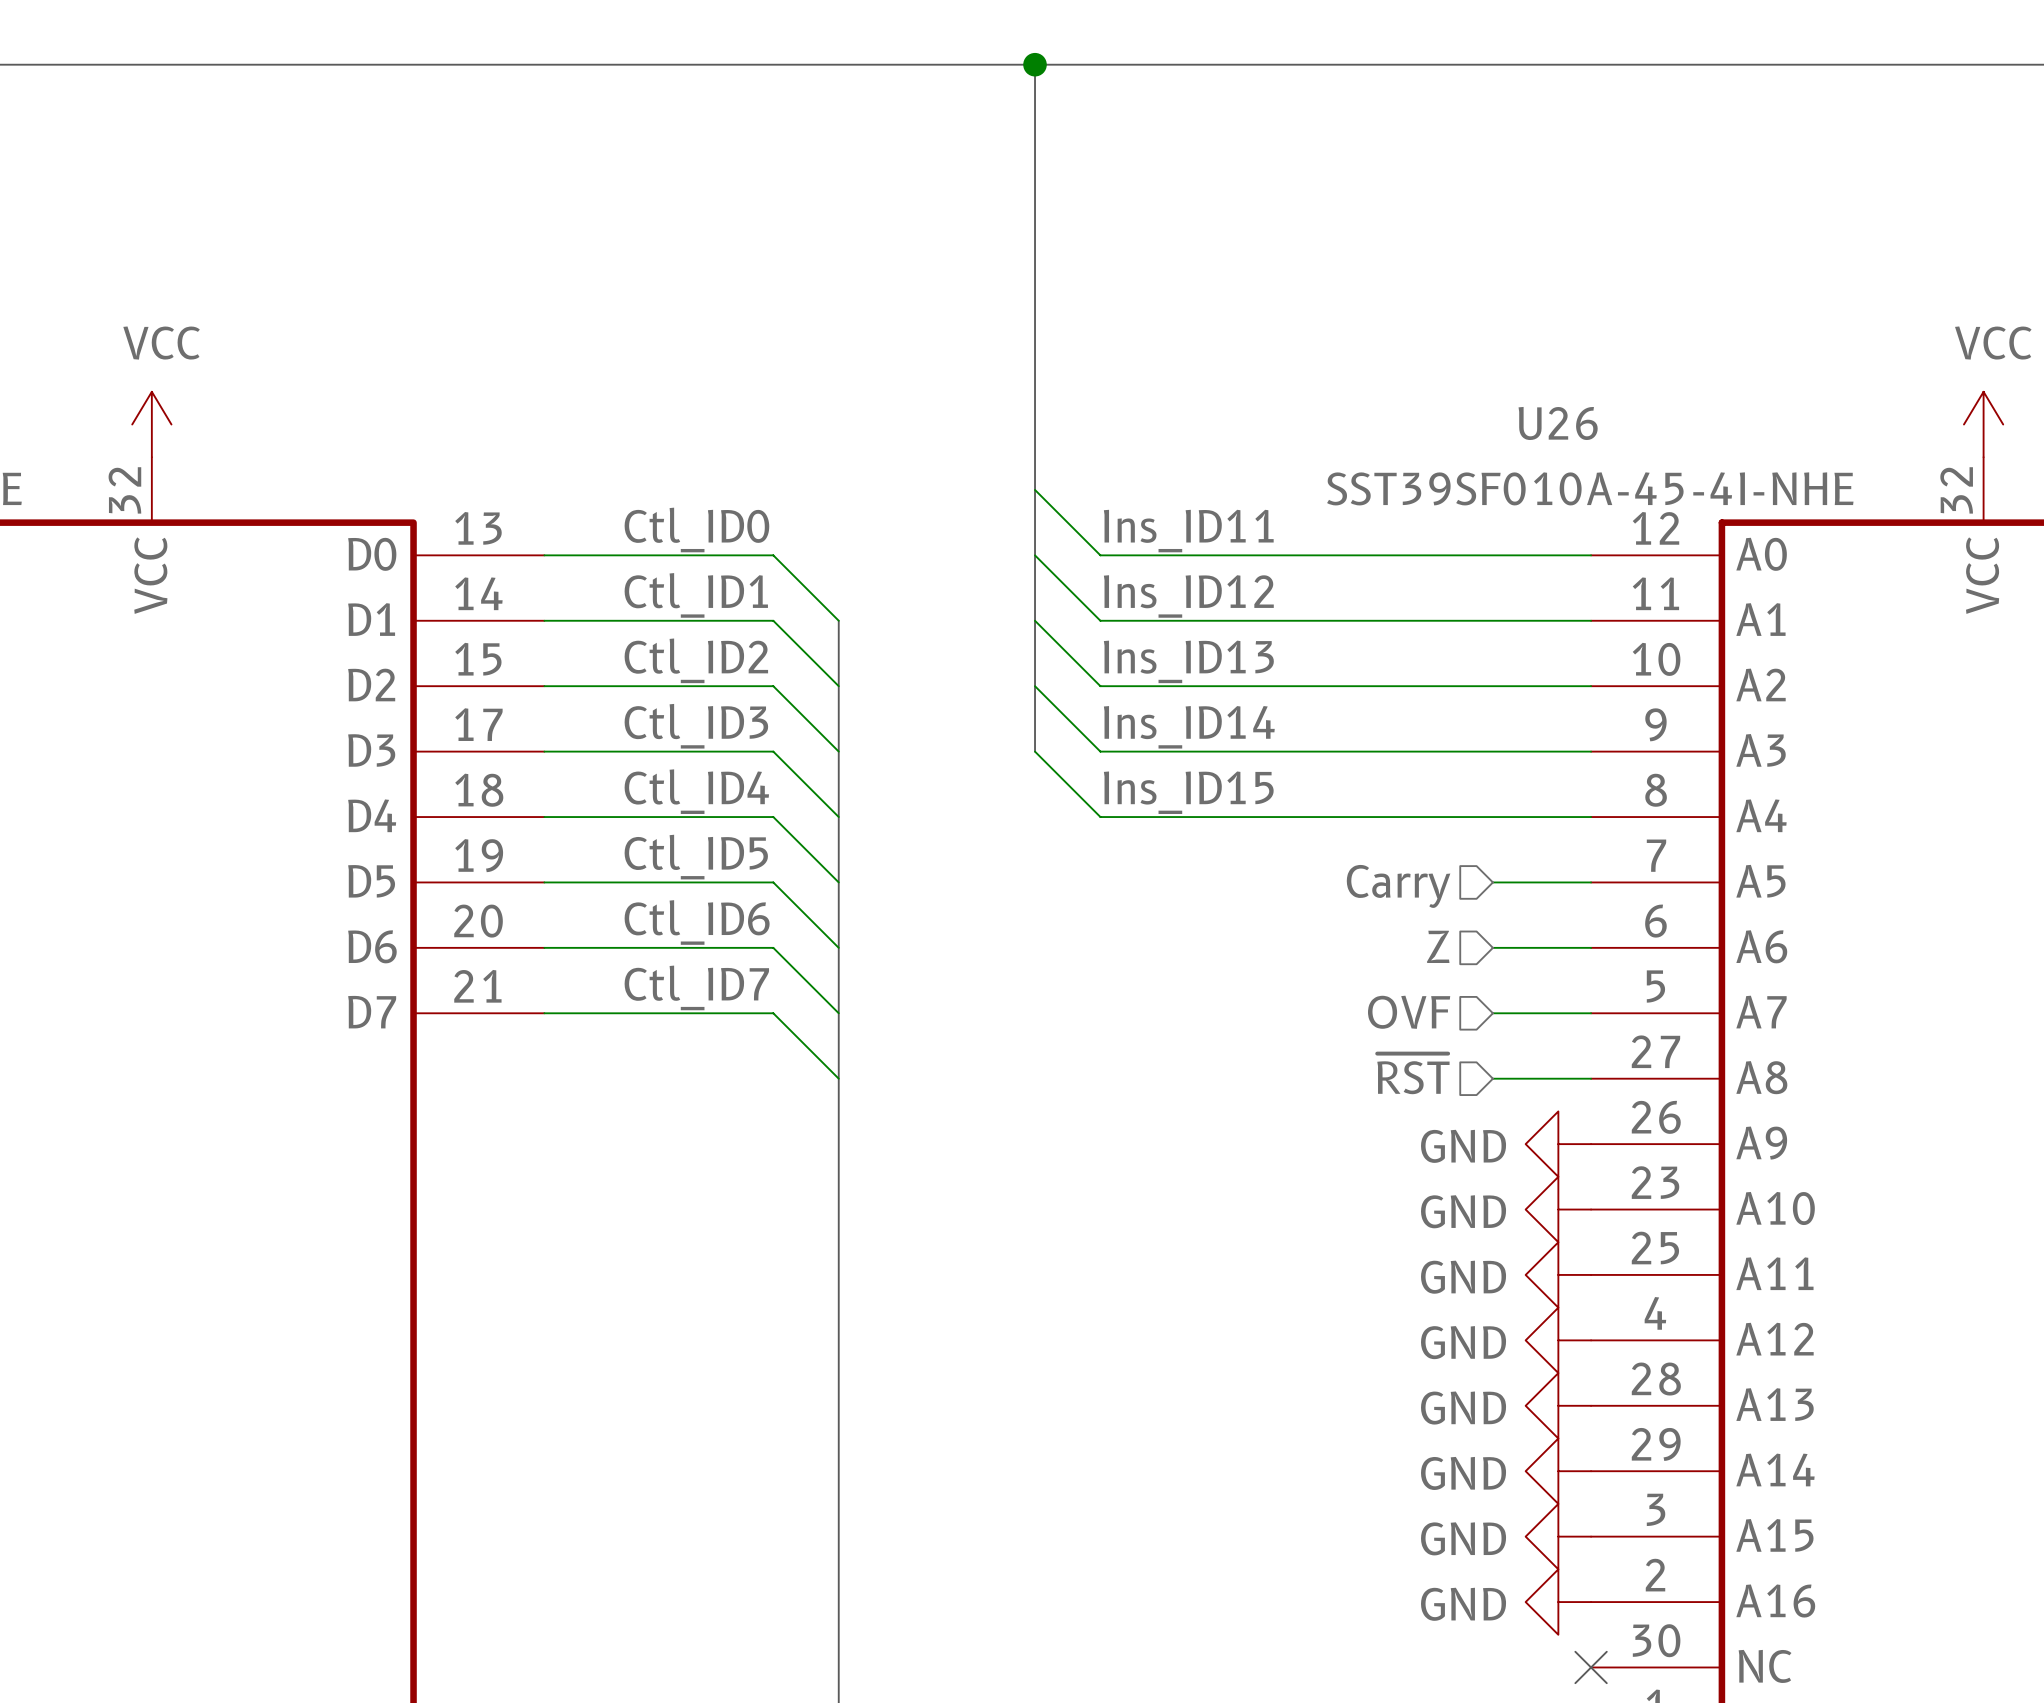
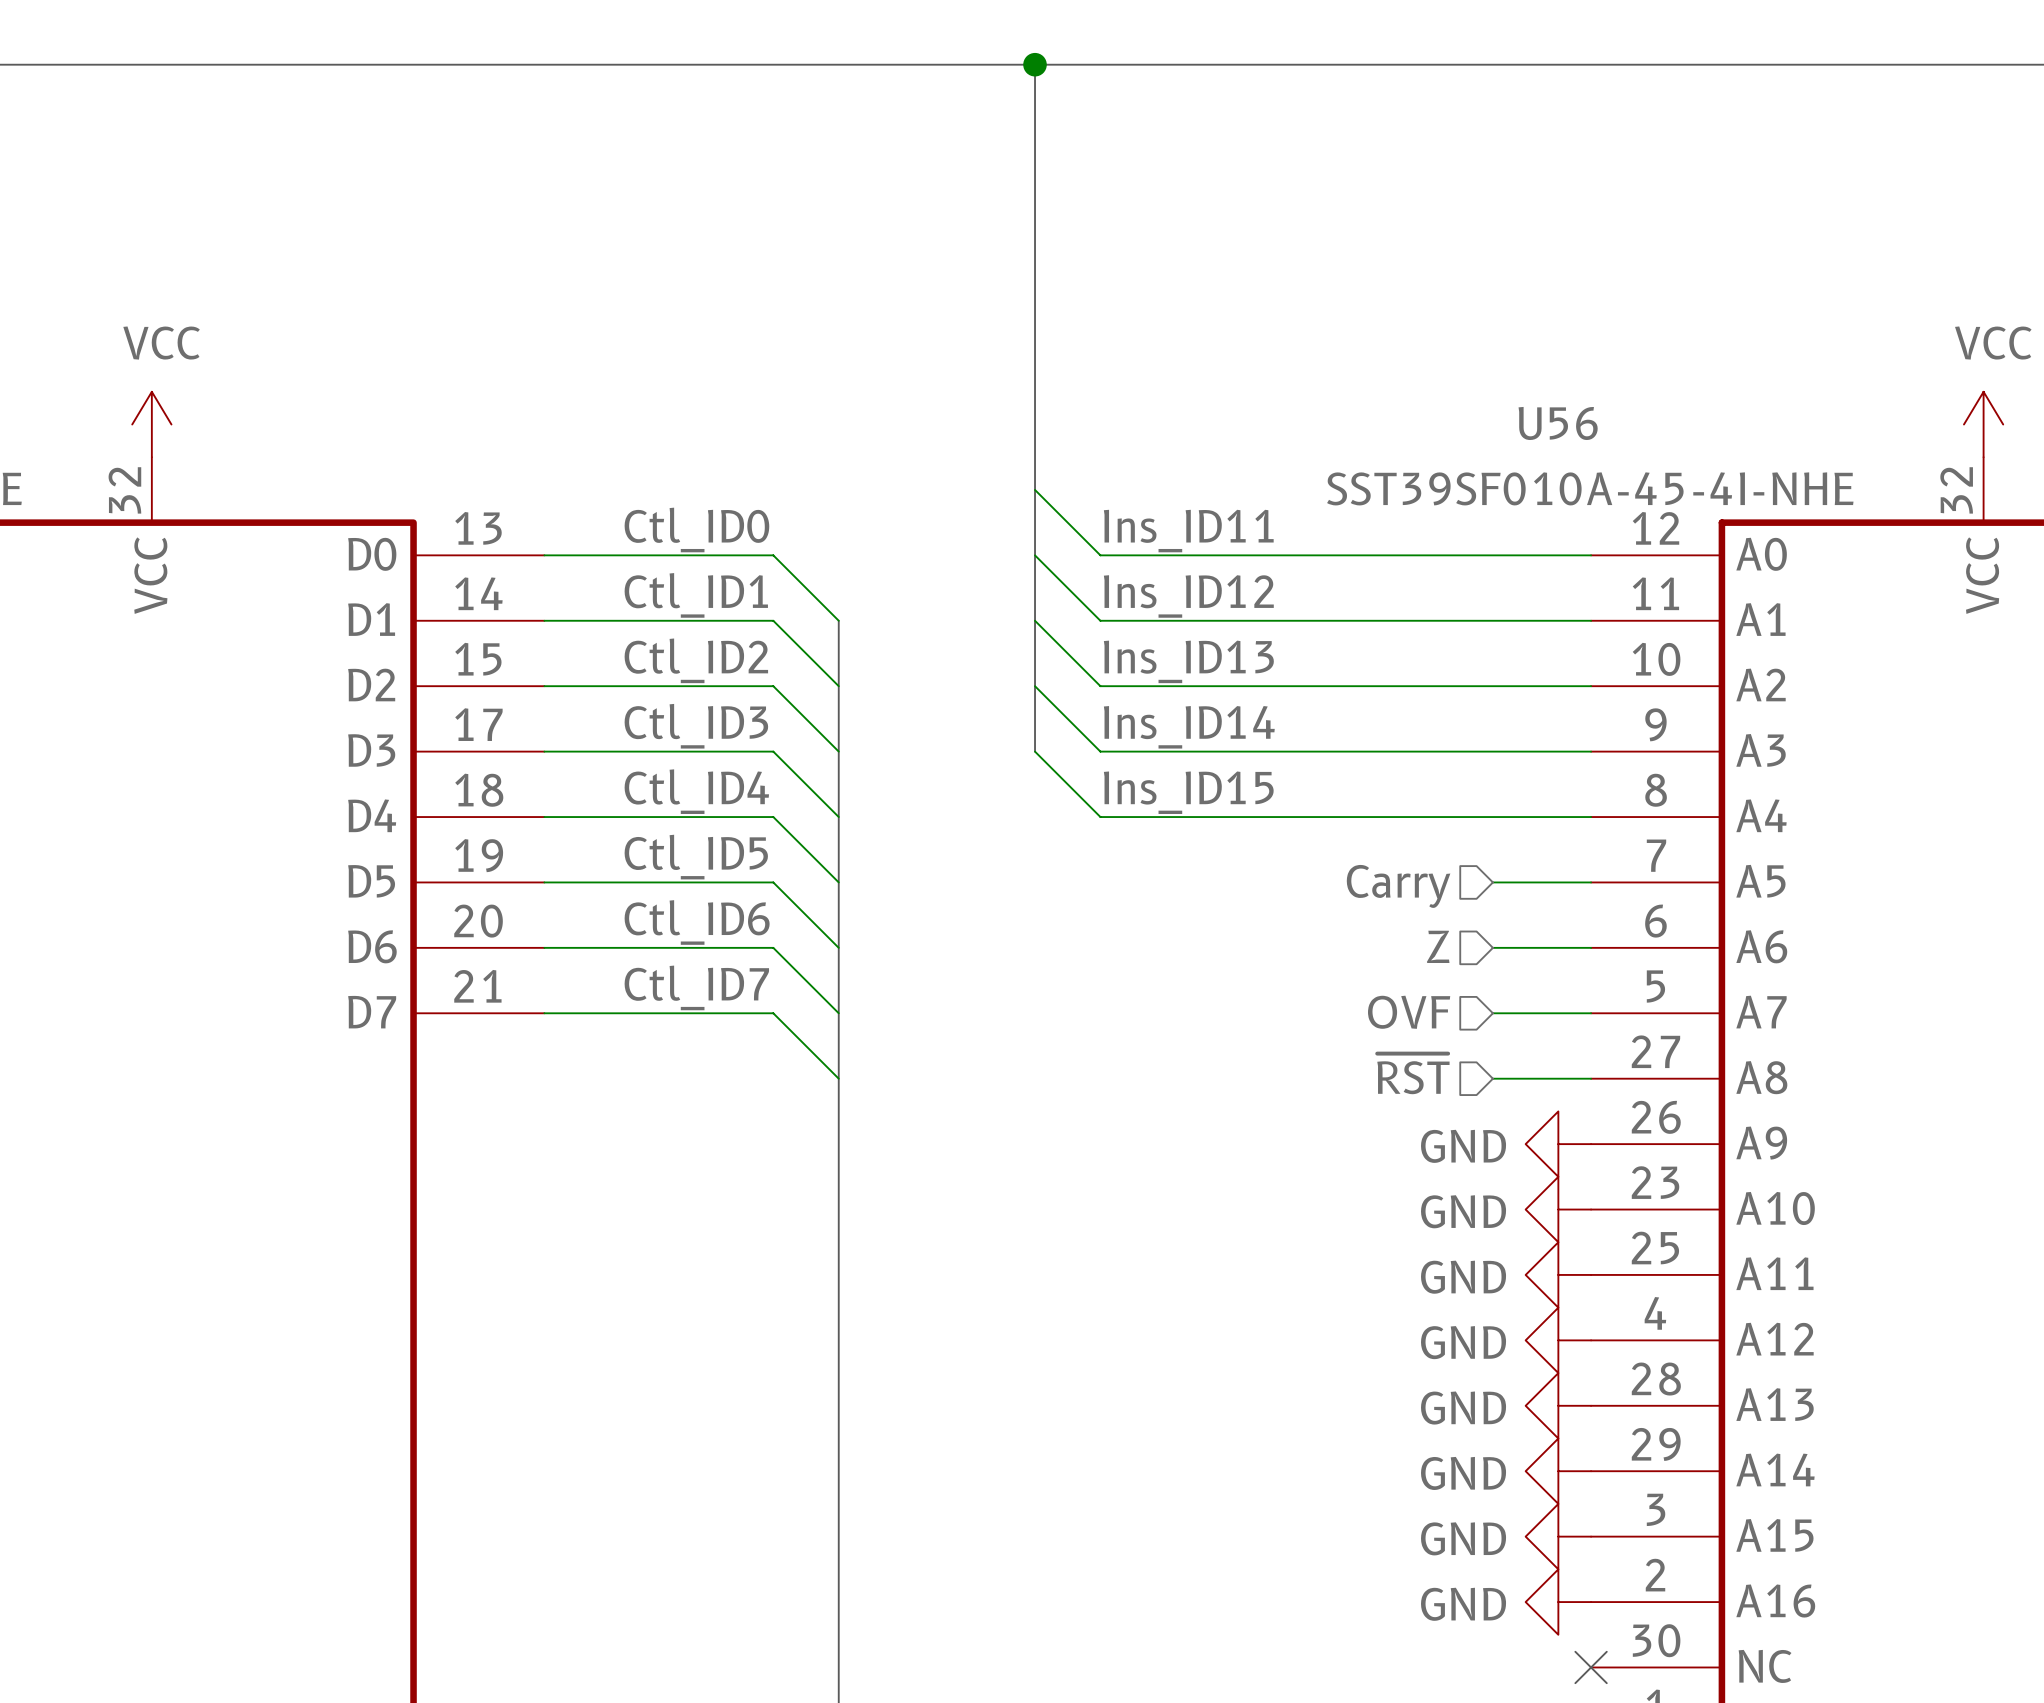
U26 name: U26 (1558, 423) -> U56 (1558, 423)

